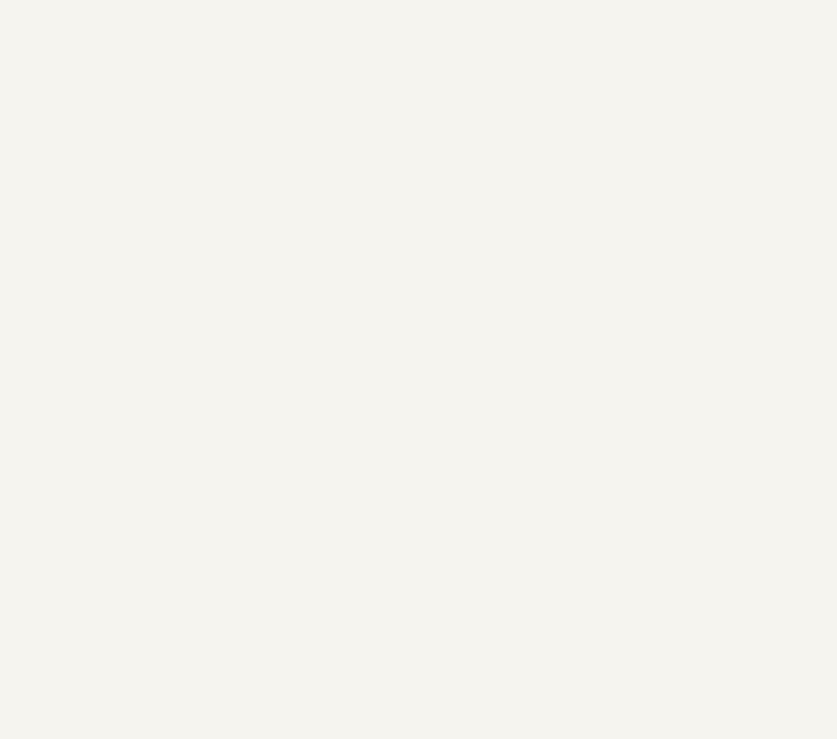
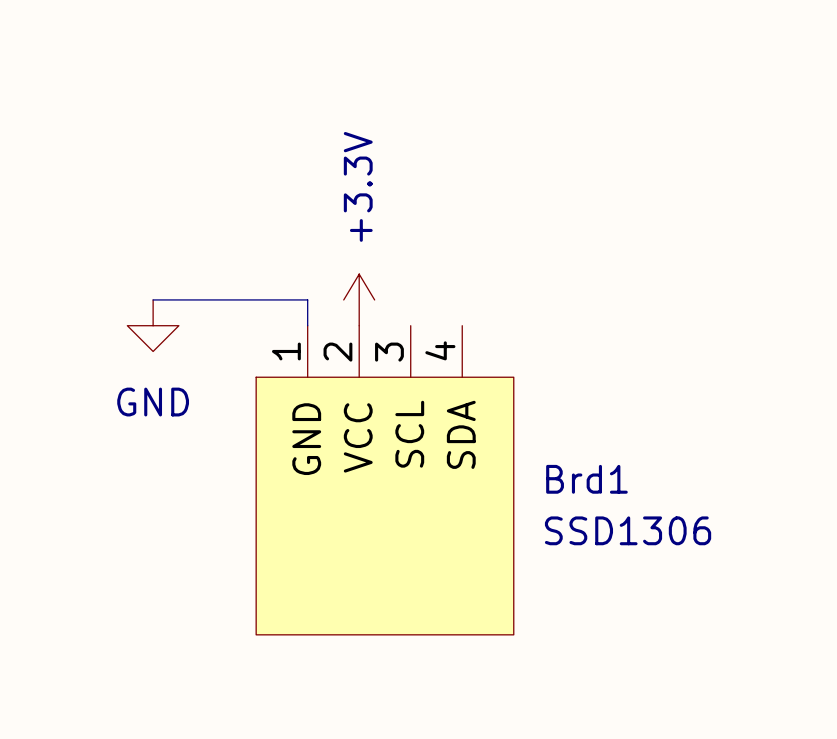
wire: none -> (153, 299) (307, 299) (307, 325)
power symbol: none -> +3.3V (359, 299)
power symbol: none -> GND (153, 325)
Brd1: none -> SSD1306 (384, 480)

